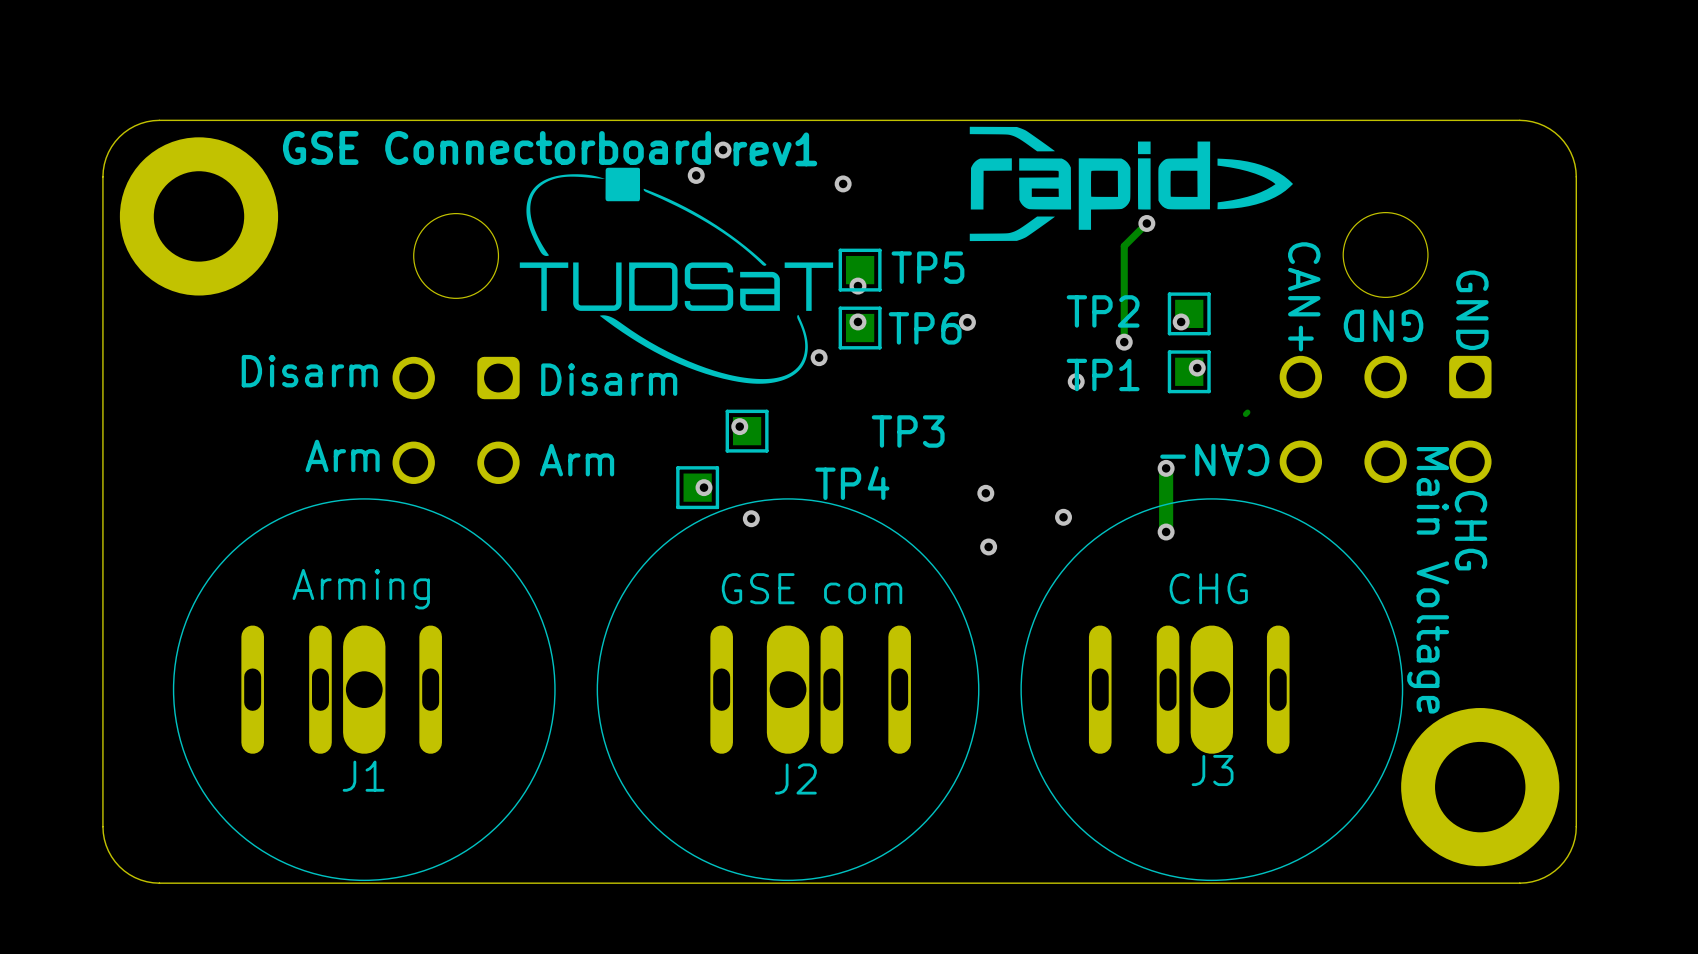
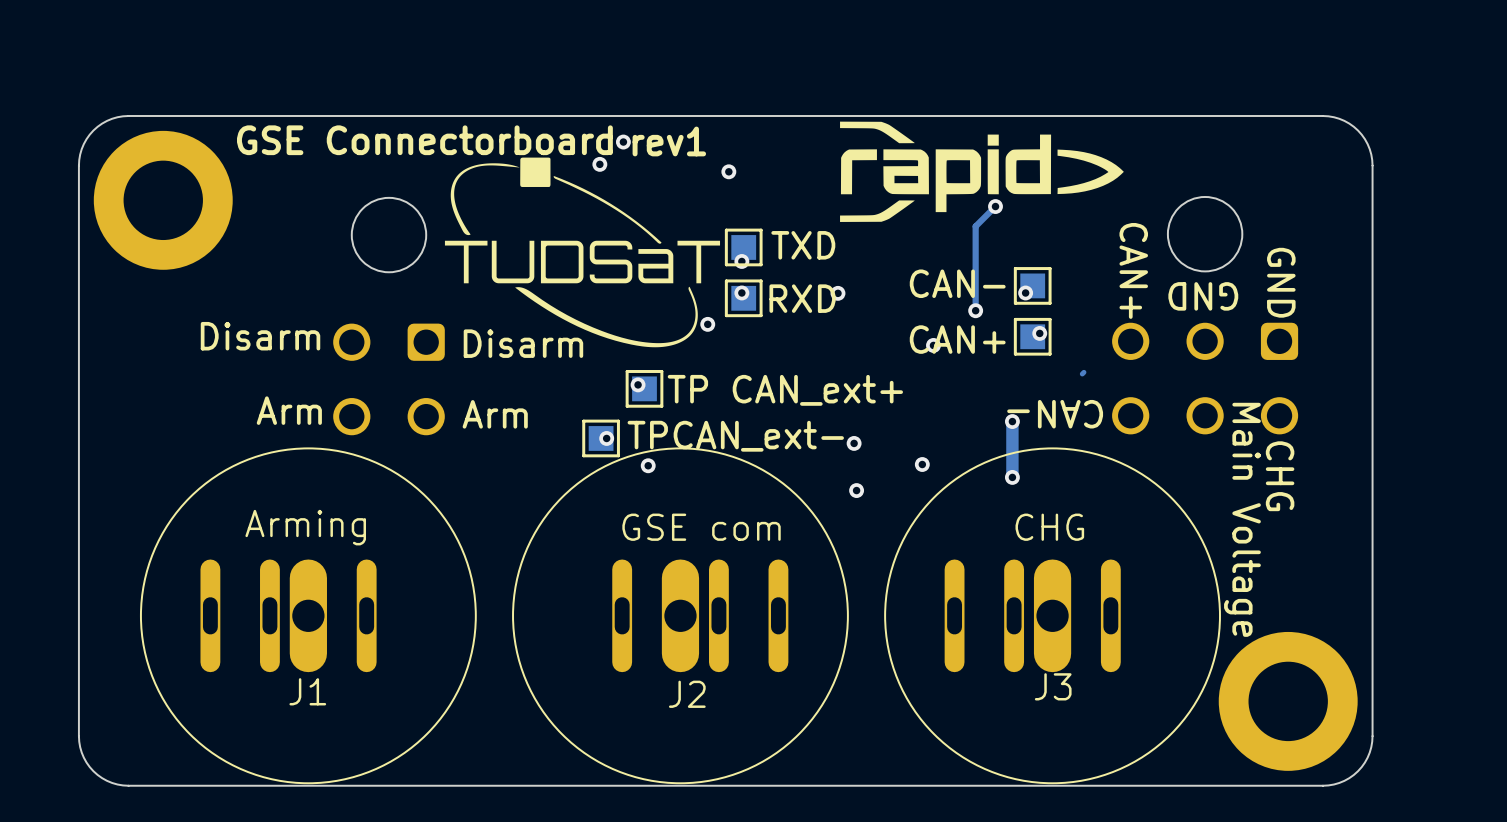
TP5 name: TP5 (927, 267) -> TXD (803, 245)
TP2 name: TP2 (1103, 311) -> CAN- (957, 283)
TP6 name: TP6 (925, 328) -> RXD (802, 298)
TP1 name: TP1 (1103, 374) -> CAN+ (957, 339)
TP3 name: TP3 (908, 431) -> TP CAN_ext+ (785, 390)
TP4 name: TP4 (852, 483) -> TPCAN_ext- (735, 436)

